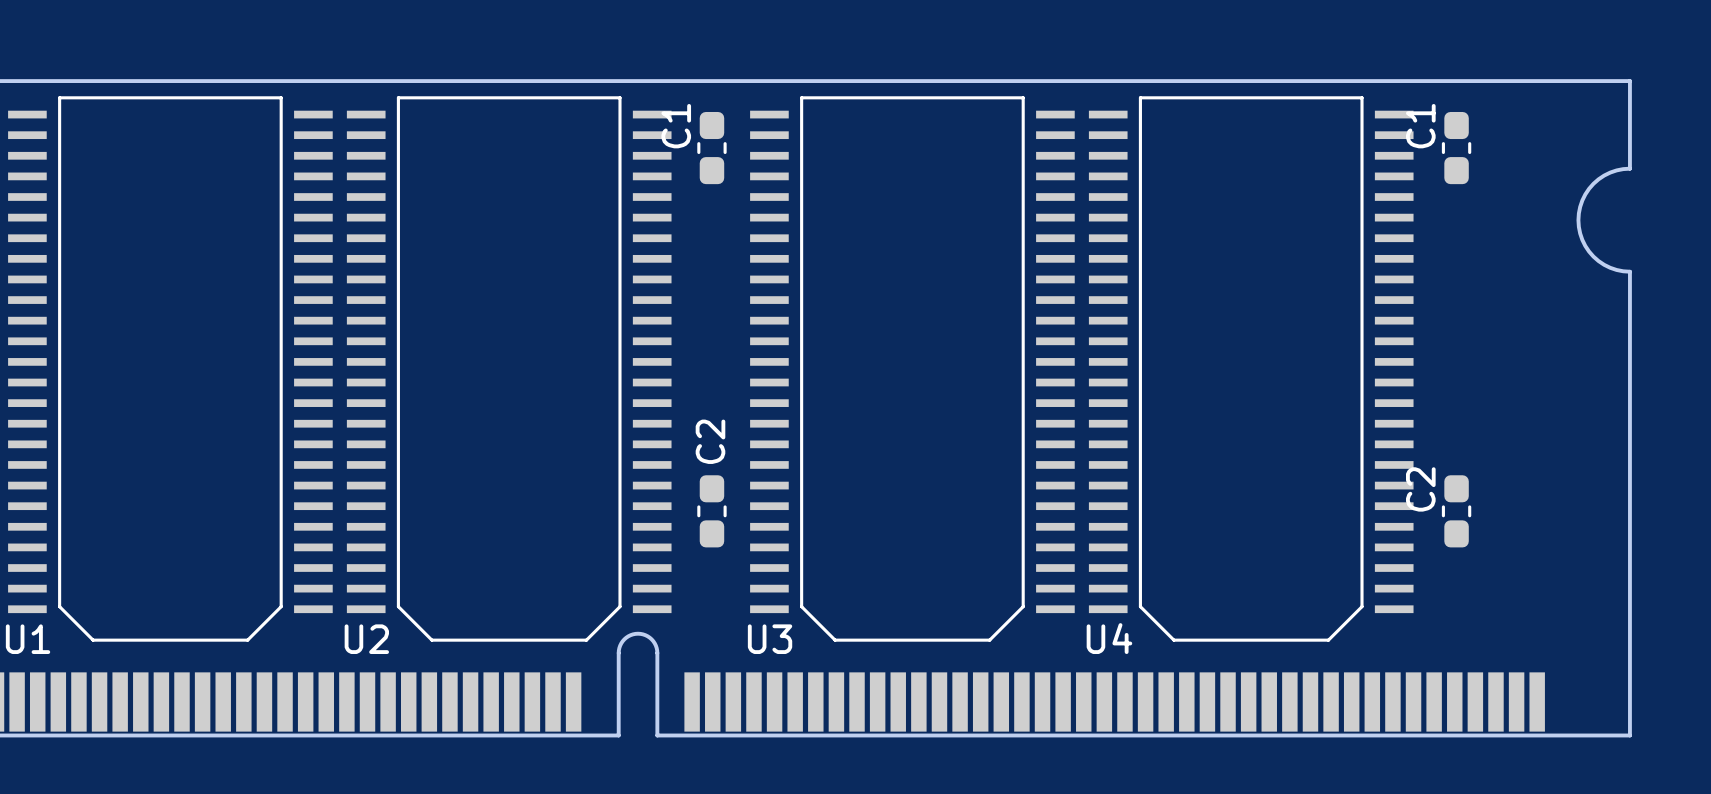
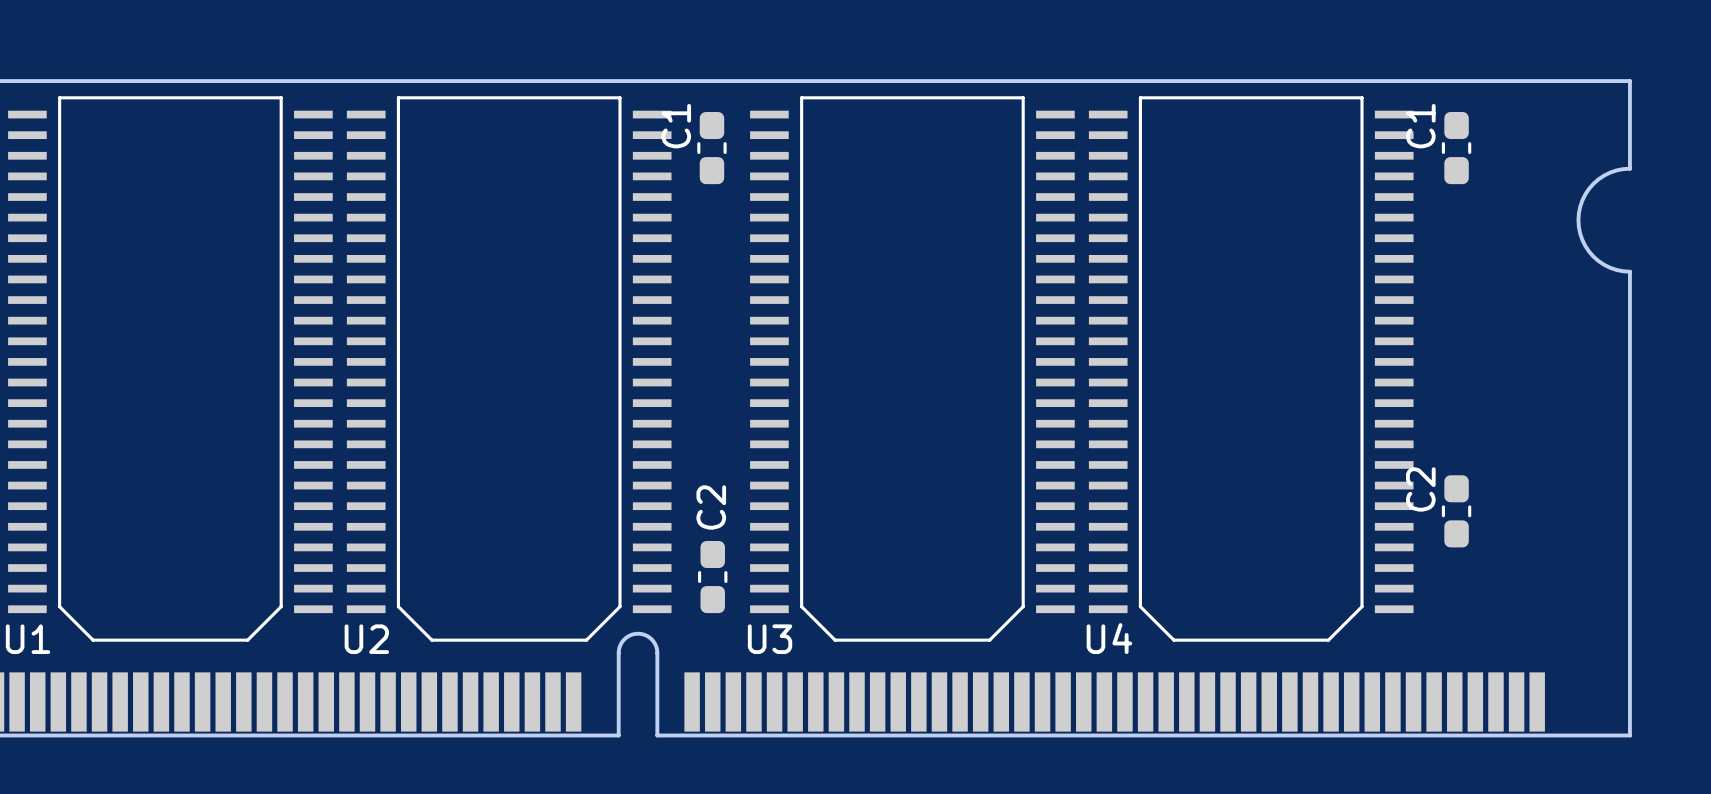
C2 position: (711, 511) -> (712, 577)

